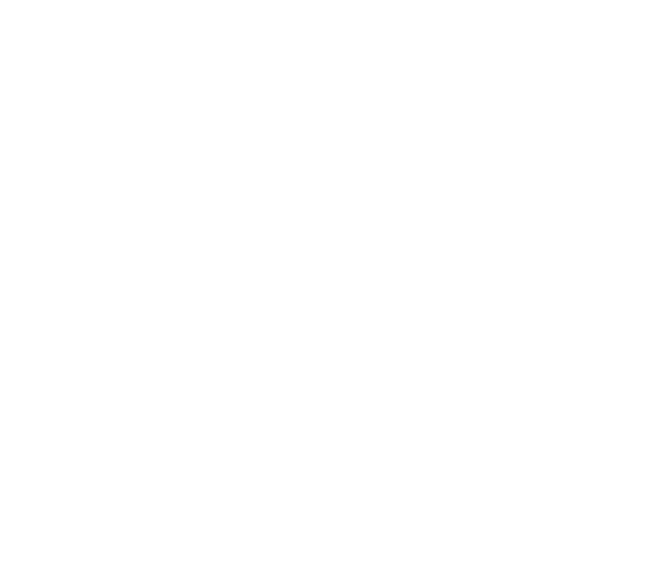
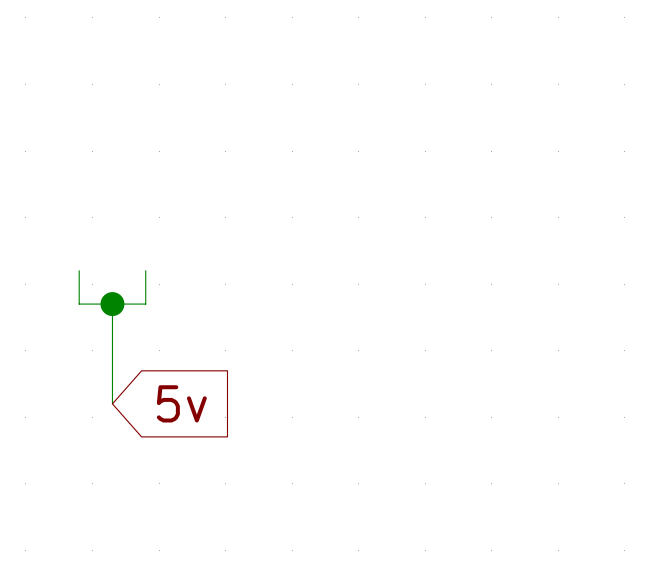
wire: none -> (79, 270) (79, 304) (145, 304) (145, 270)
wire: none -> (112, 304) (112, 403)
junction: none -> (112, 304)
global label: none -> 5v (181, 403)

